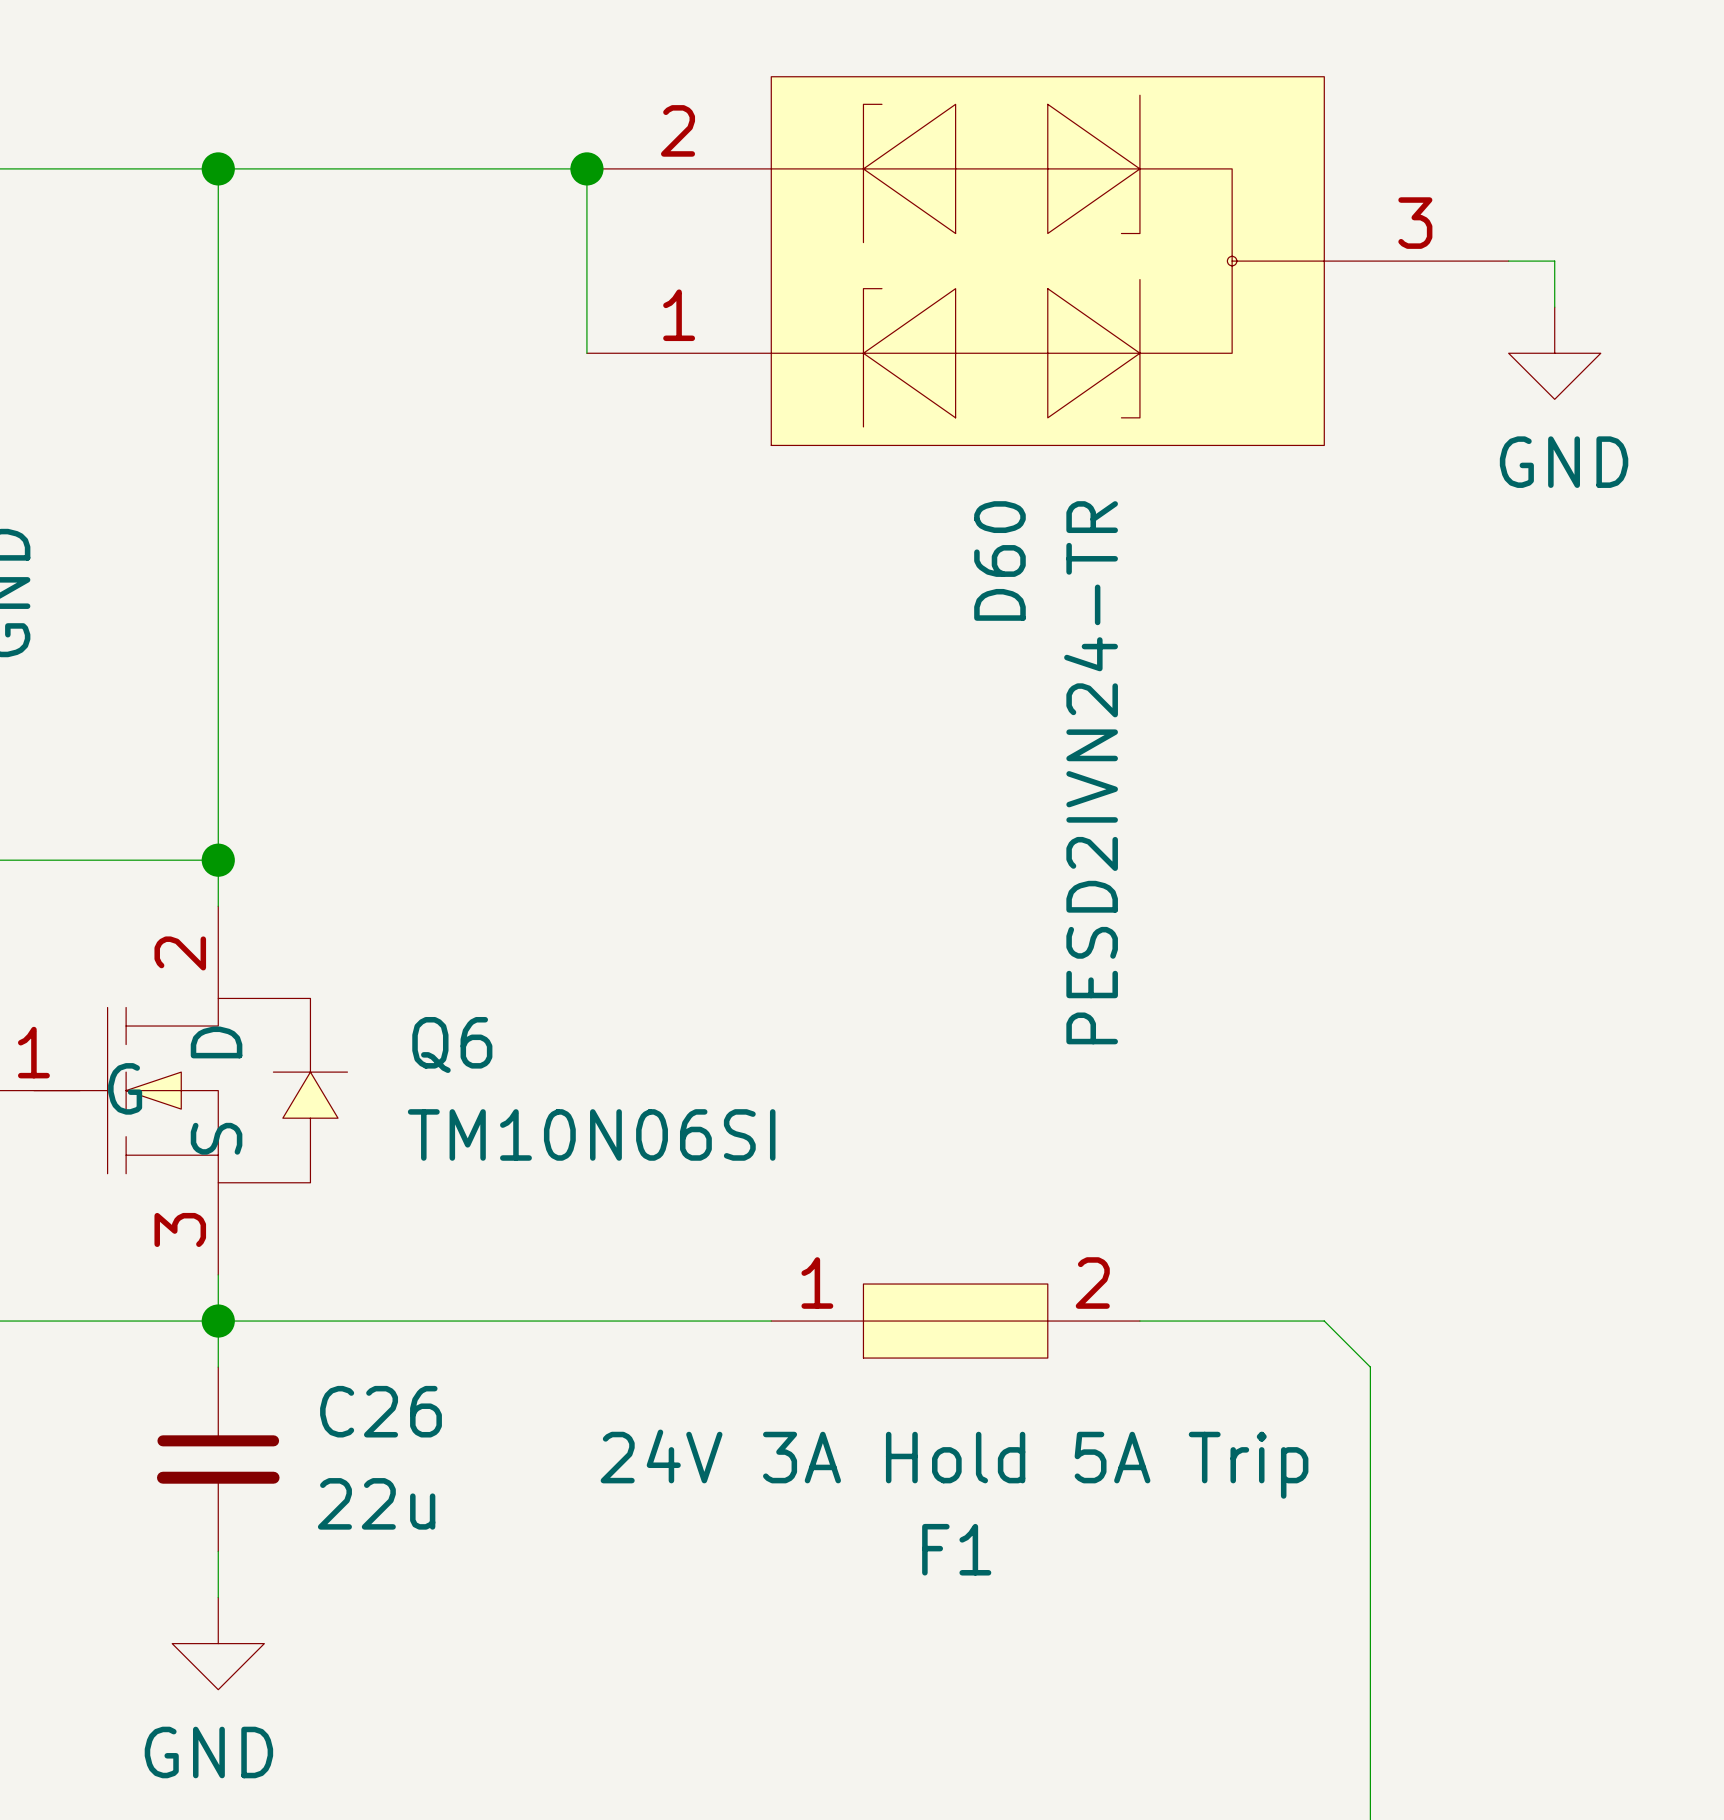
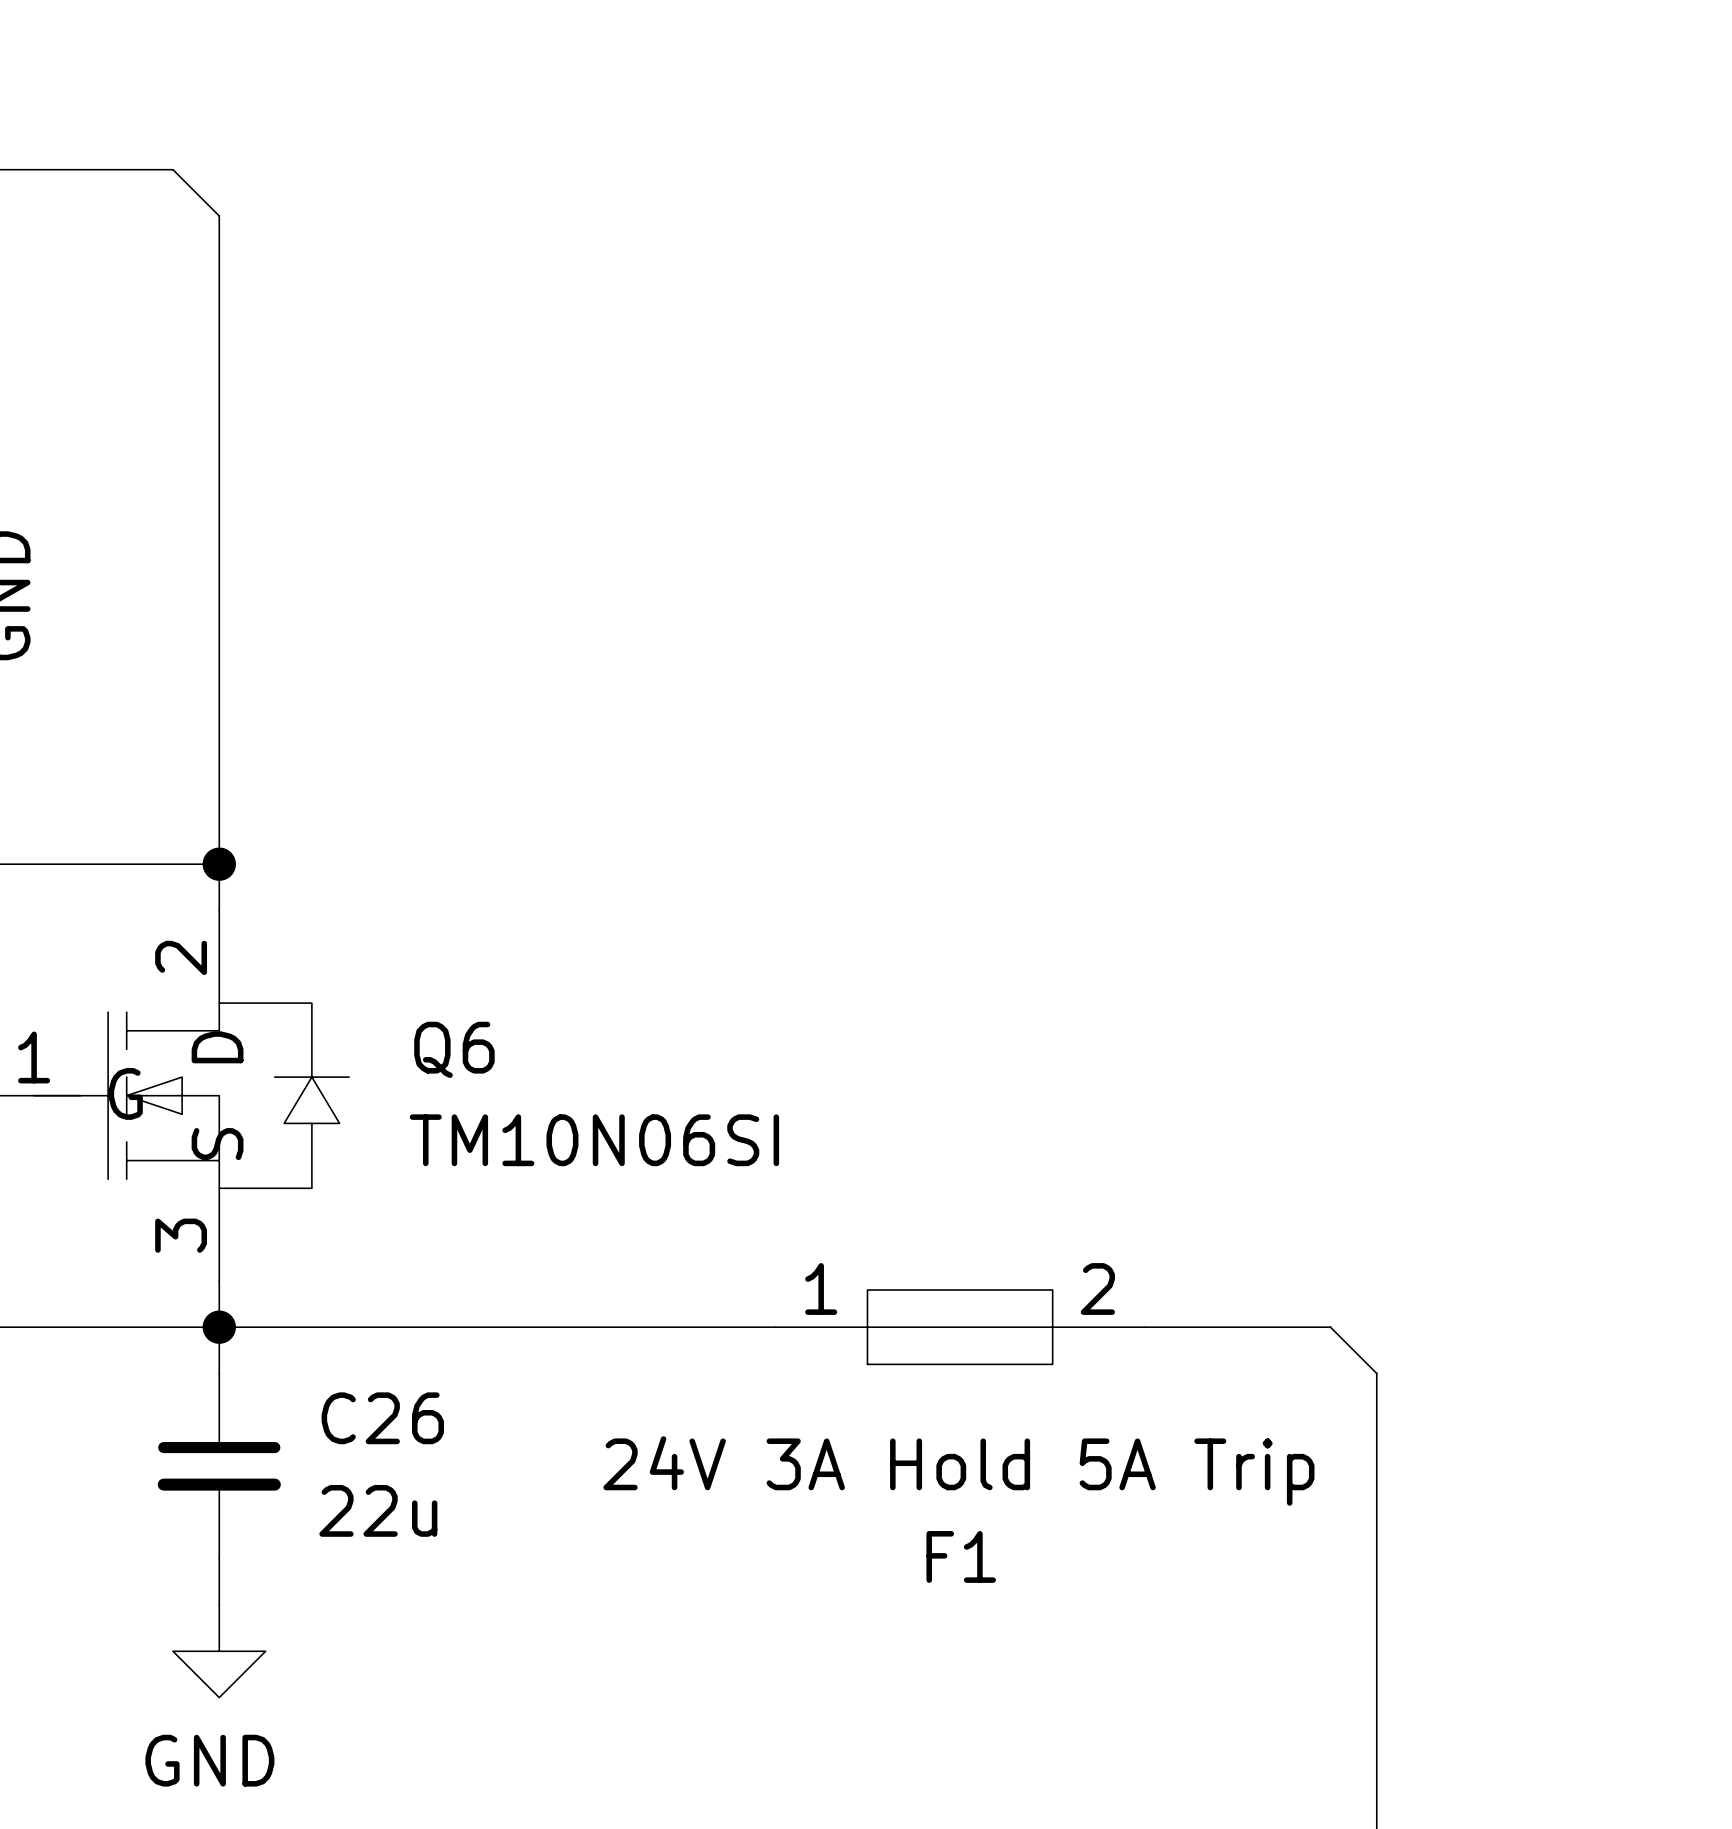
wire: (172, 168) (586, 168) (586, 353) -> none
wire: (218, 168) (218, 215) -> (172, 169) (219, 216)
junction: (218, 168) -> none
junction: (586, 168) -> none
D60: PESD2IVN24-TR (1047, 261) -> none
wire: (1508, 261) (1554, 261) (1554, 307) -> none
power symbol: GND (1554, 353) -> none

